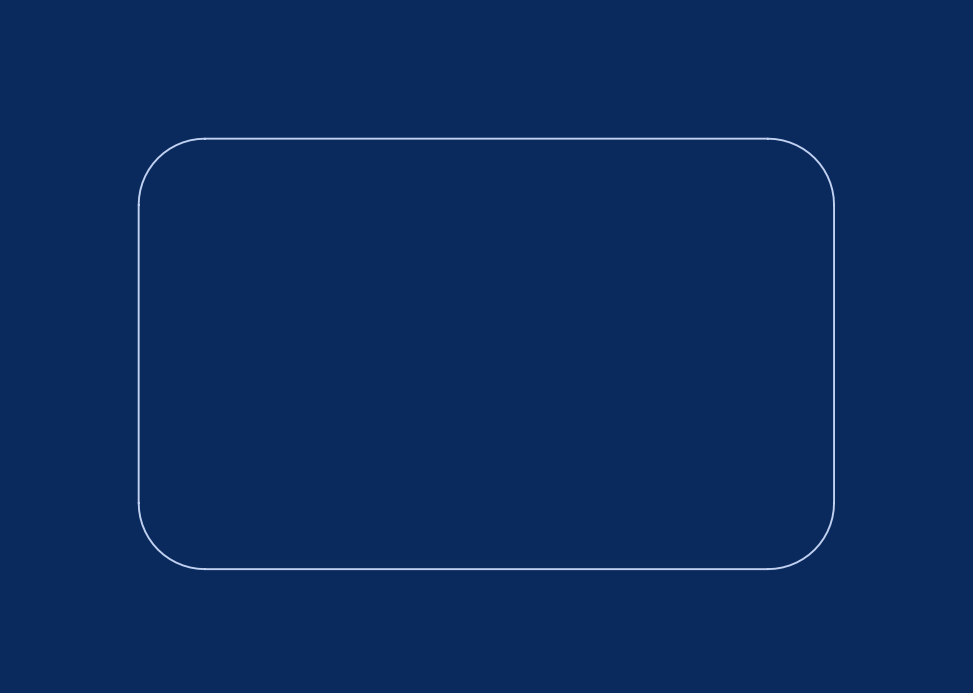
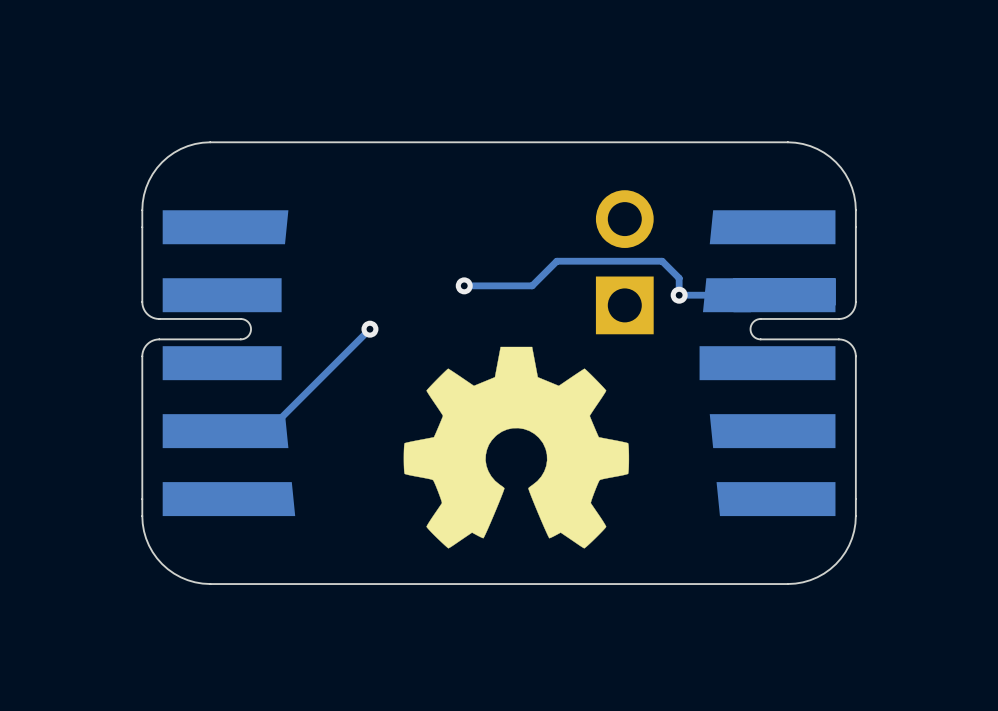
board edge: (138, 221) (138, 486) -> none
board edge: (834, 221) (834, 486) -> none
part: none -> (624, 262)
track: none -> (464, 285) (532, 285) (556, 261) (662, 261) (679, 278) (679, 295) (784, 295)
via: none -> (464, 285)
via: none -> (679, 295)
track: none -> (369, 329) (268, 431) (223, 431)
via: none -> (369, 329)
drawing: none -> [403, 346, 630, 549]
part: none -> (218, 363)
part: none -> (778, 363)

